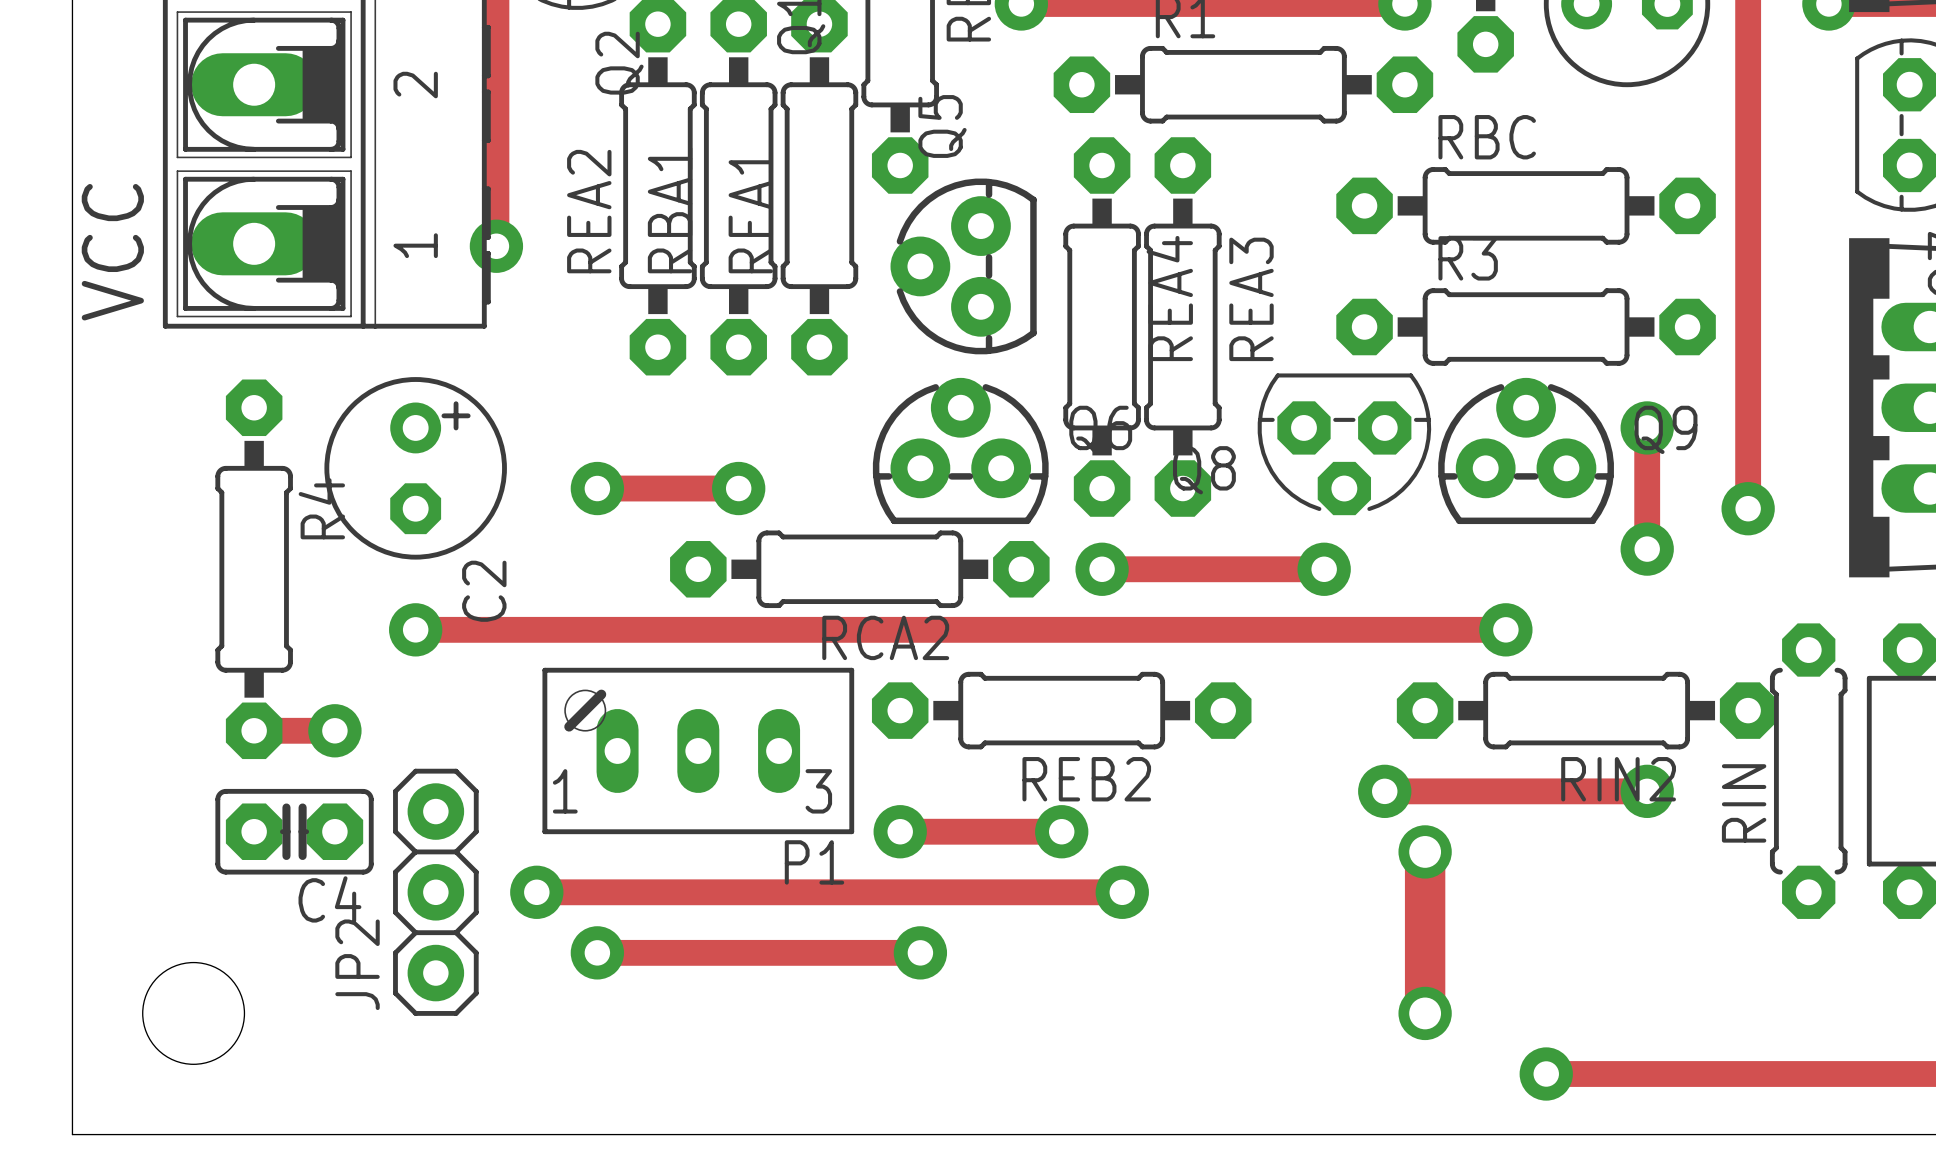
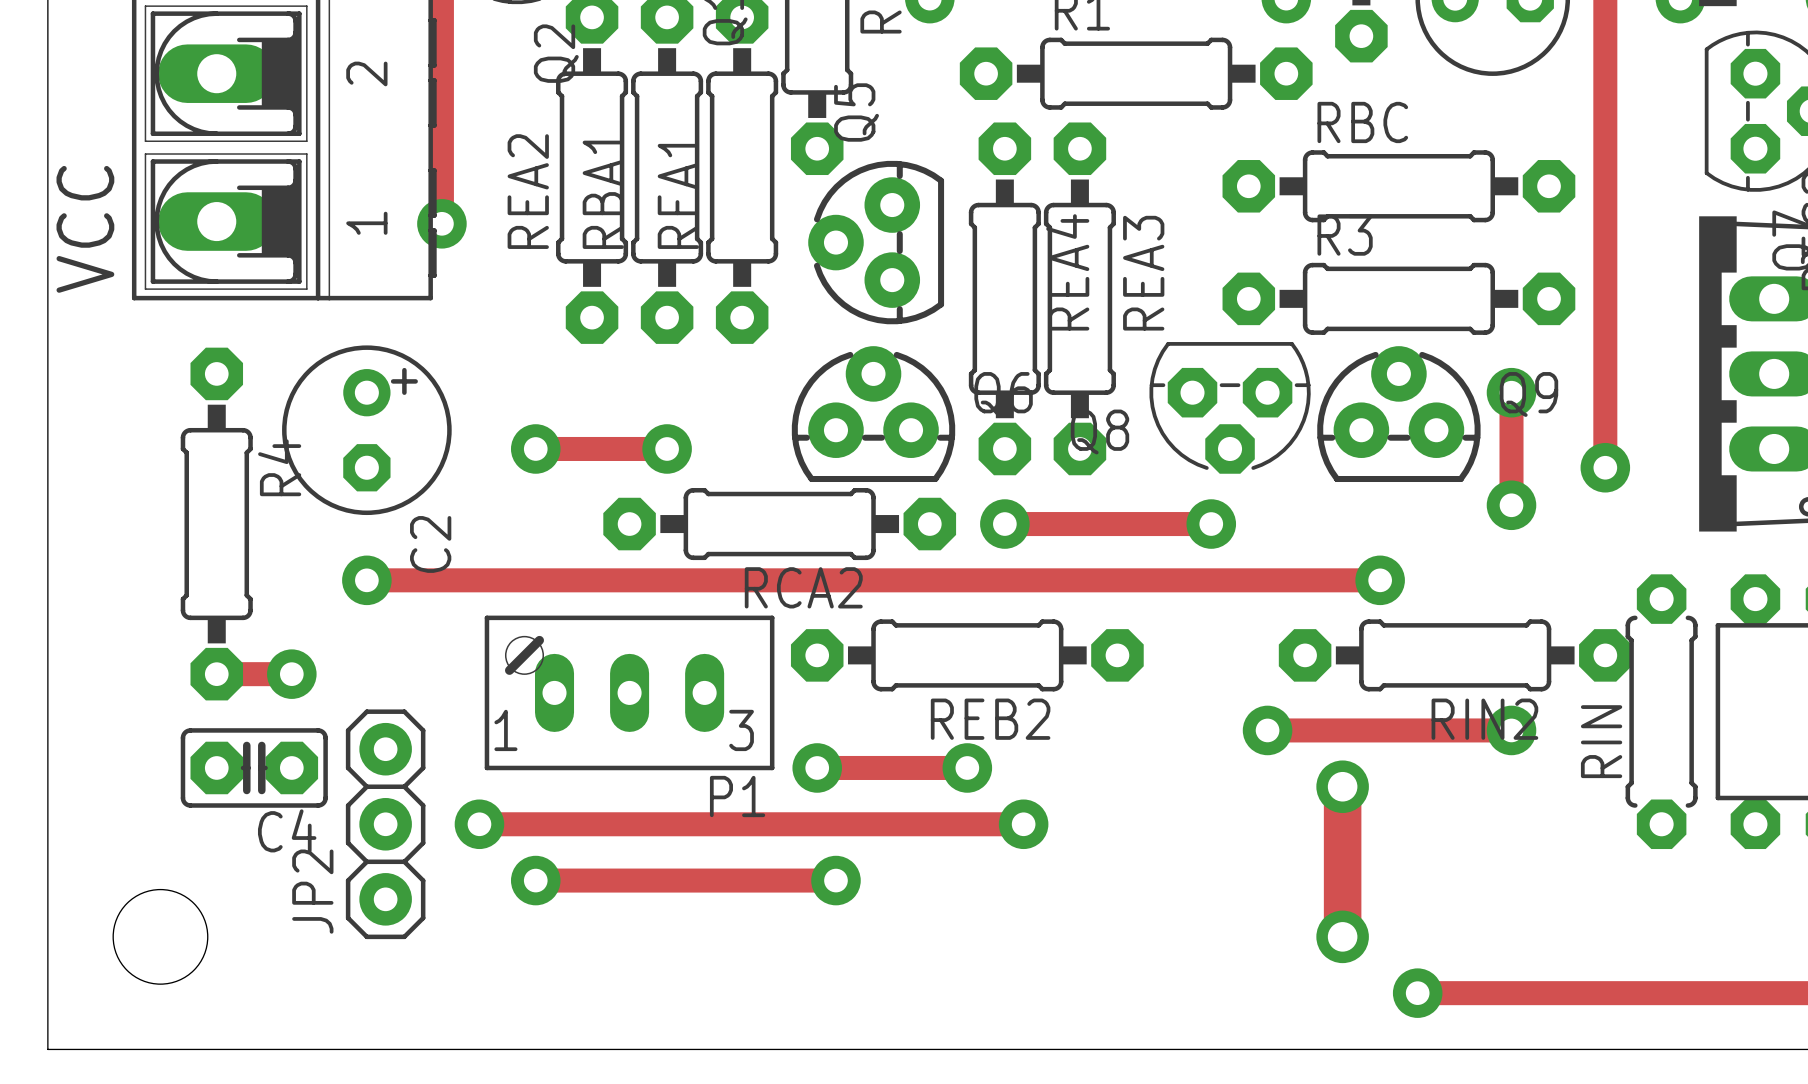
track: (1425, 851) (1425, 1013) -> (1342, 786) (1342, 936)
via: (1425, 851) -> none
via: none -> (1342, 786)
via: (1425, 1013) -> none
via: none -> (1342, 936)

